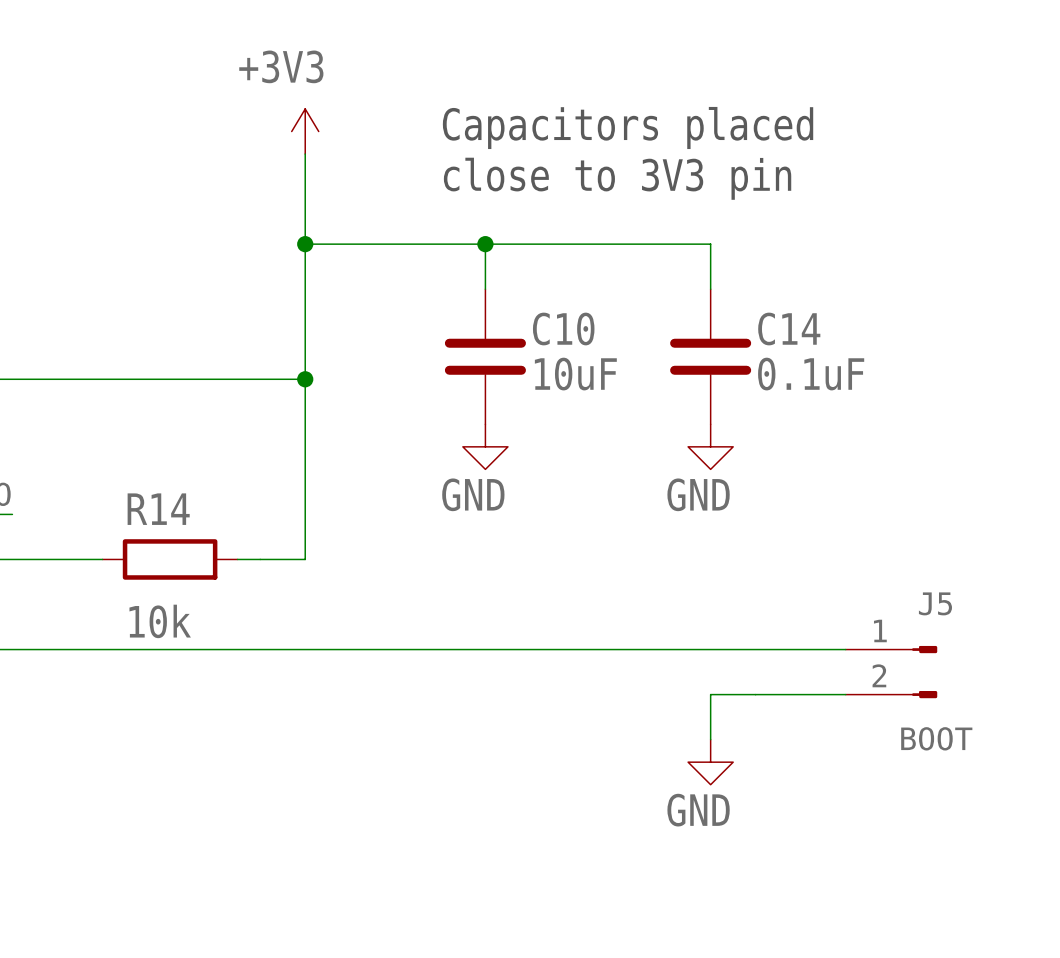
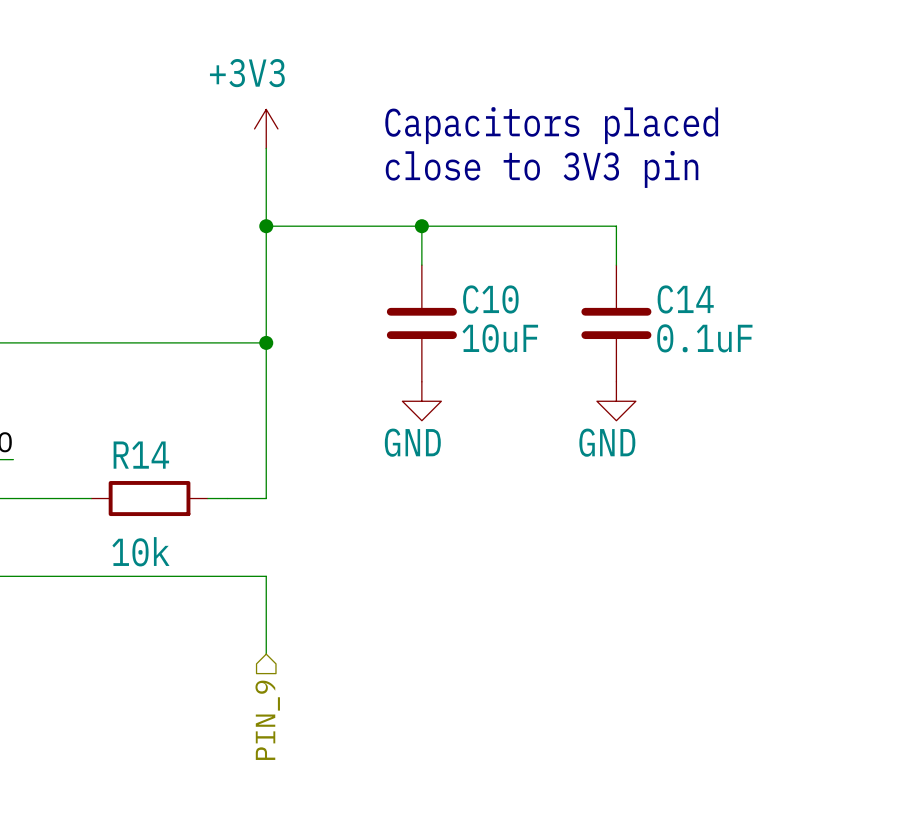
wire: (305, 649) (845, 649) -> (266, 576) (266, 654)
J5: BOOT (891, 672) -> none
wire: (845, 694) (710, 694) (710, 739) -> none
power symbol: GND (710, 762) -> none
hierarchical label: none -> PIN_9 (267, 720)

